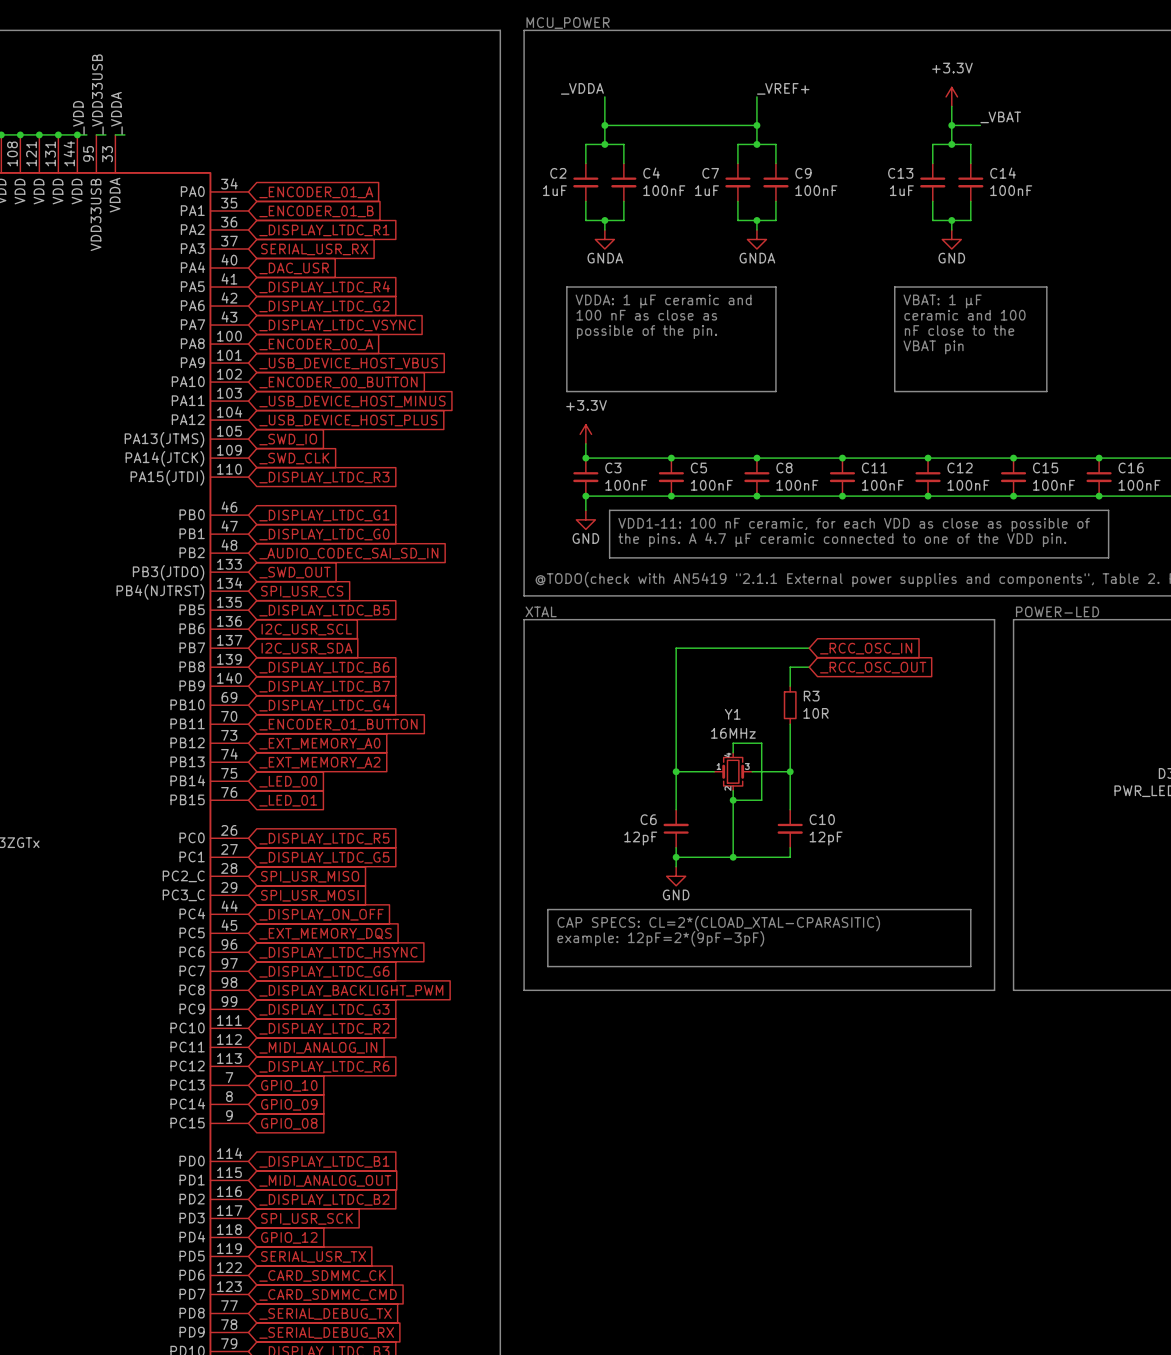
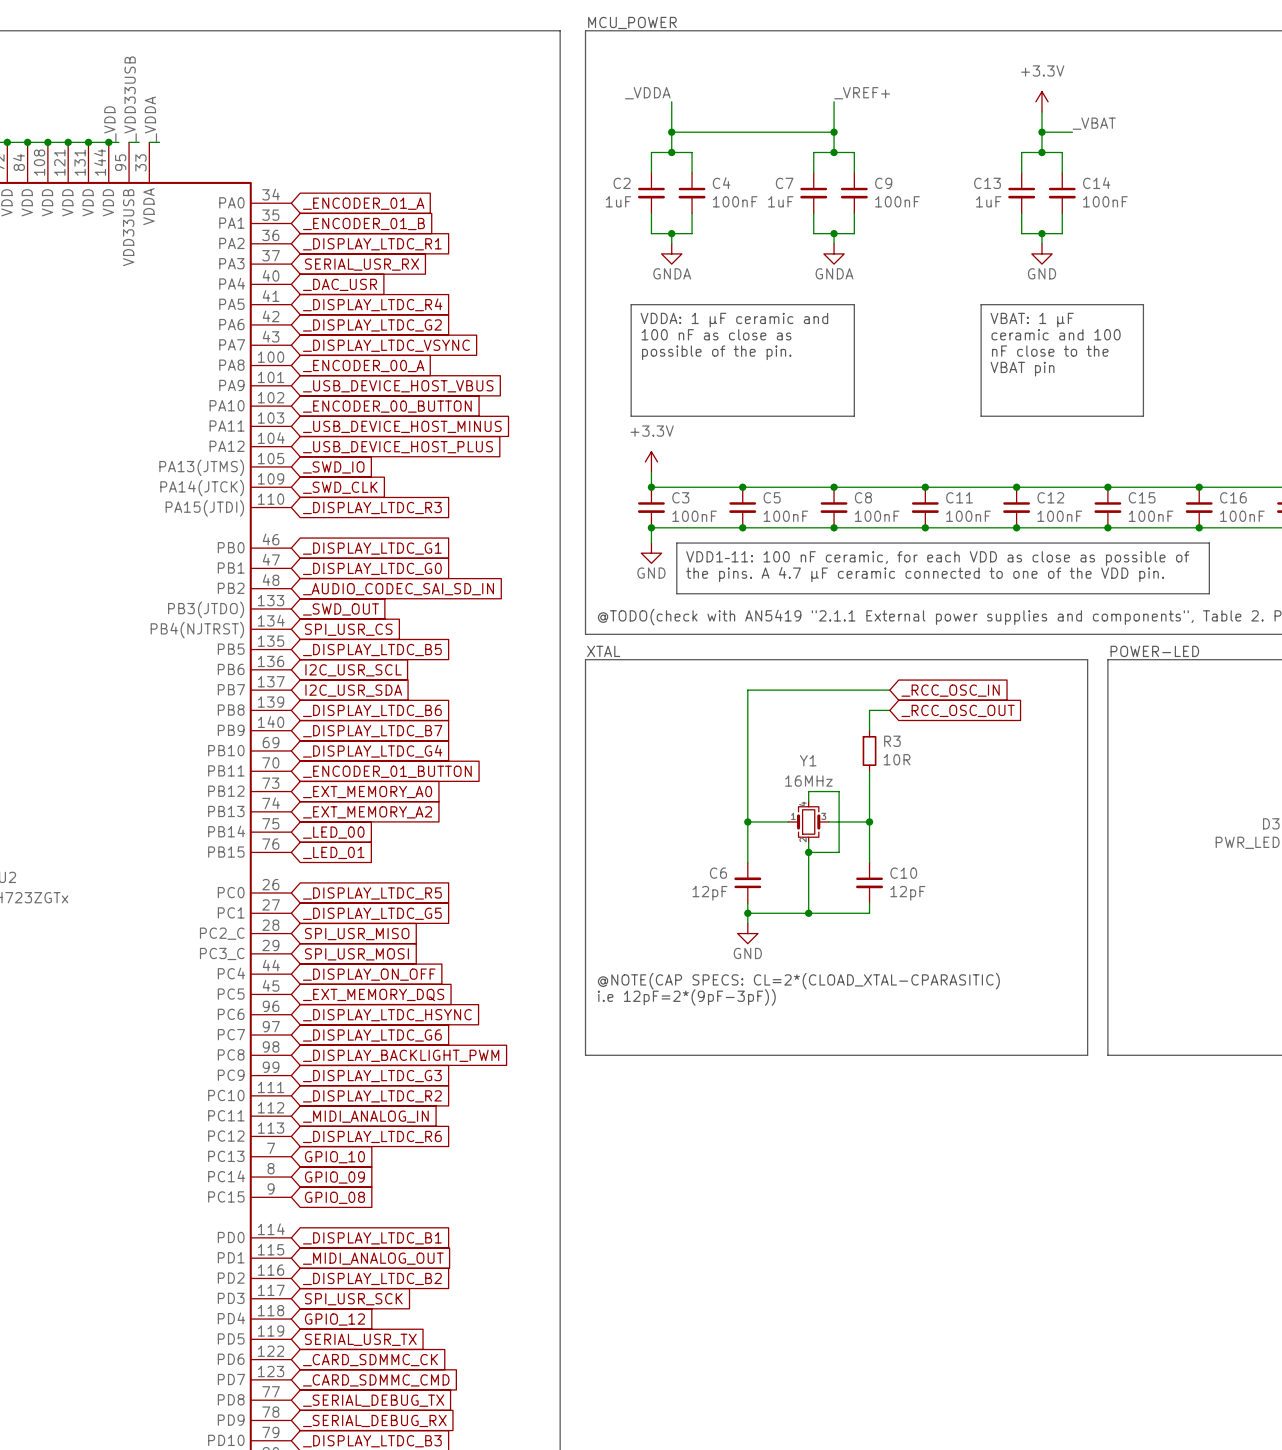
line: (547, 909) (970, 909) (970, 966) (547, 966) (547, 909) -> none
text: CAP SPECS: CL=2*(CLOAD_XTAL-CPARASITIC) (718, 923) -> @NOTE(CAP SPECS: CL=2*(CLOAD_XTAL-CPARASITIC) (798, 981)
text: example: 12pF=2*(9pF-3pF) (660, 938) -> i.e 12pF=2*(9pF-3pF)) (686, 997)

